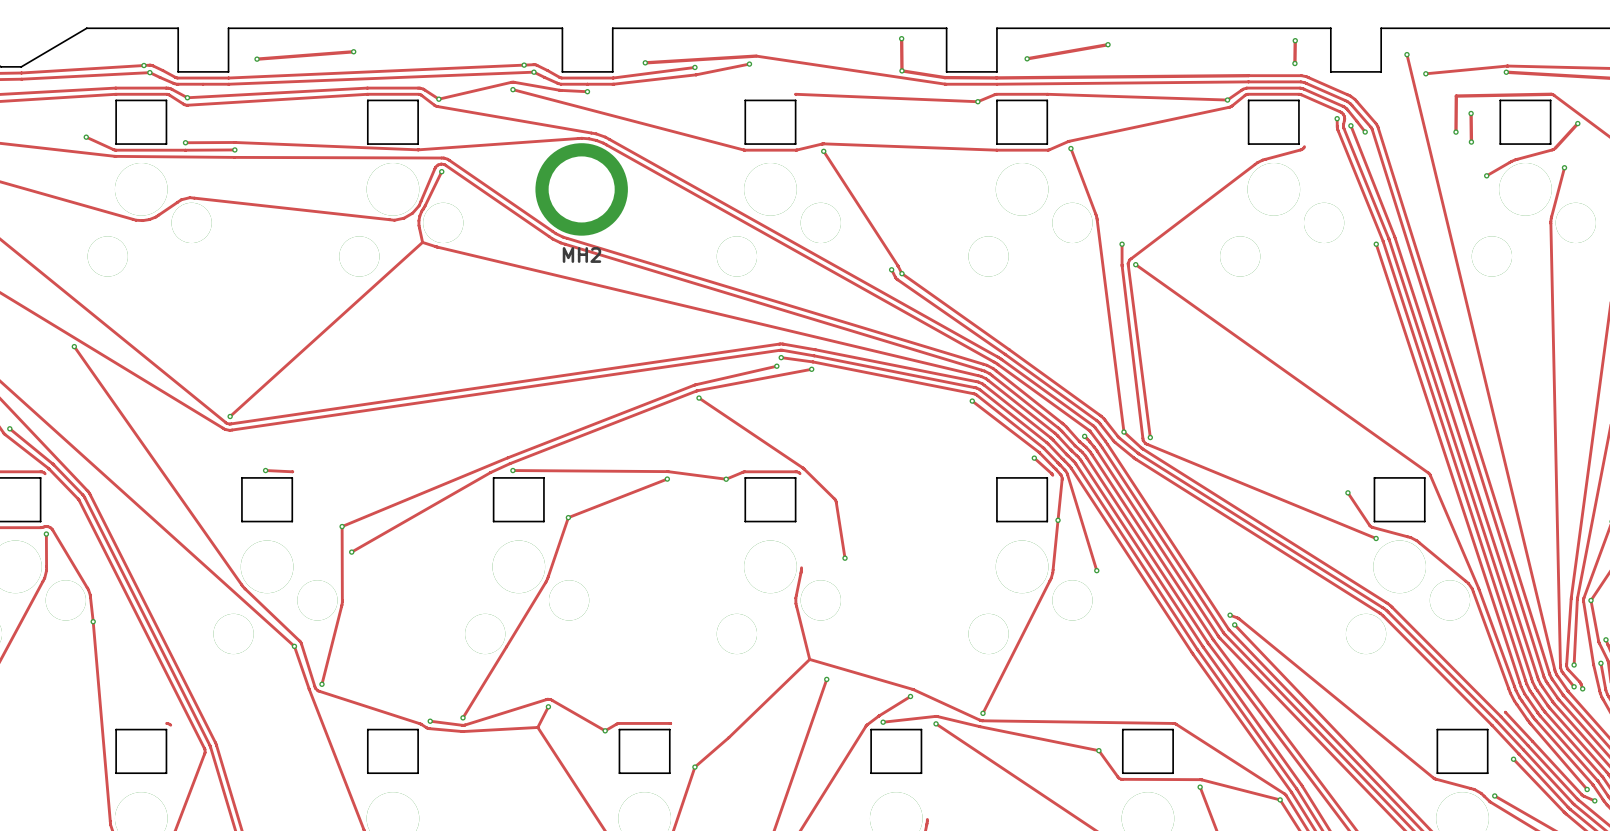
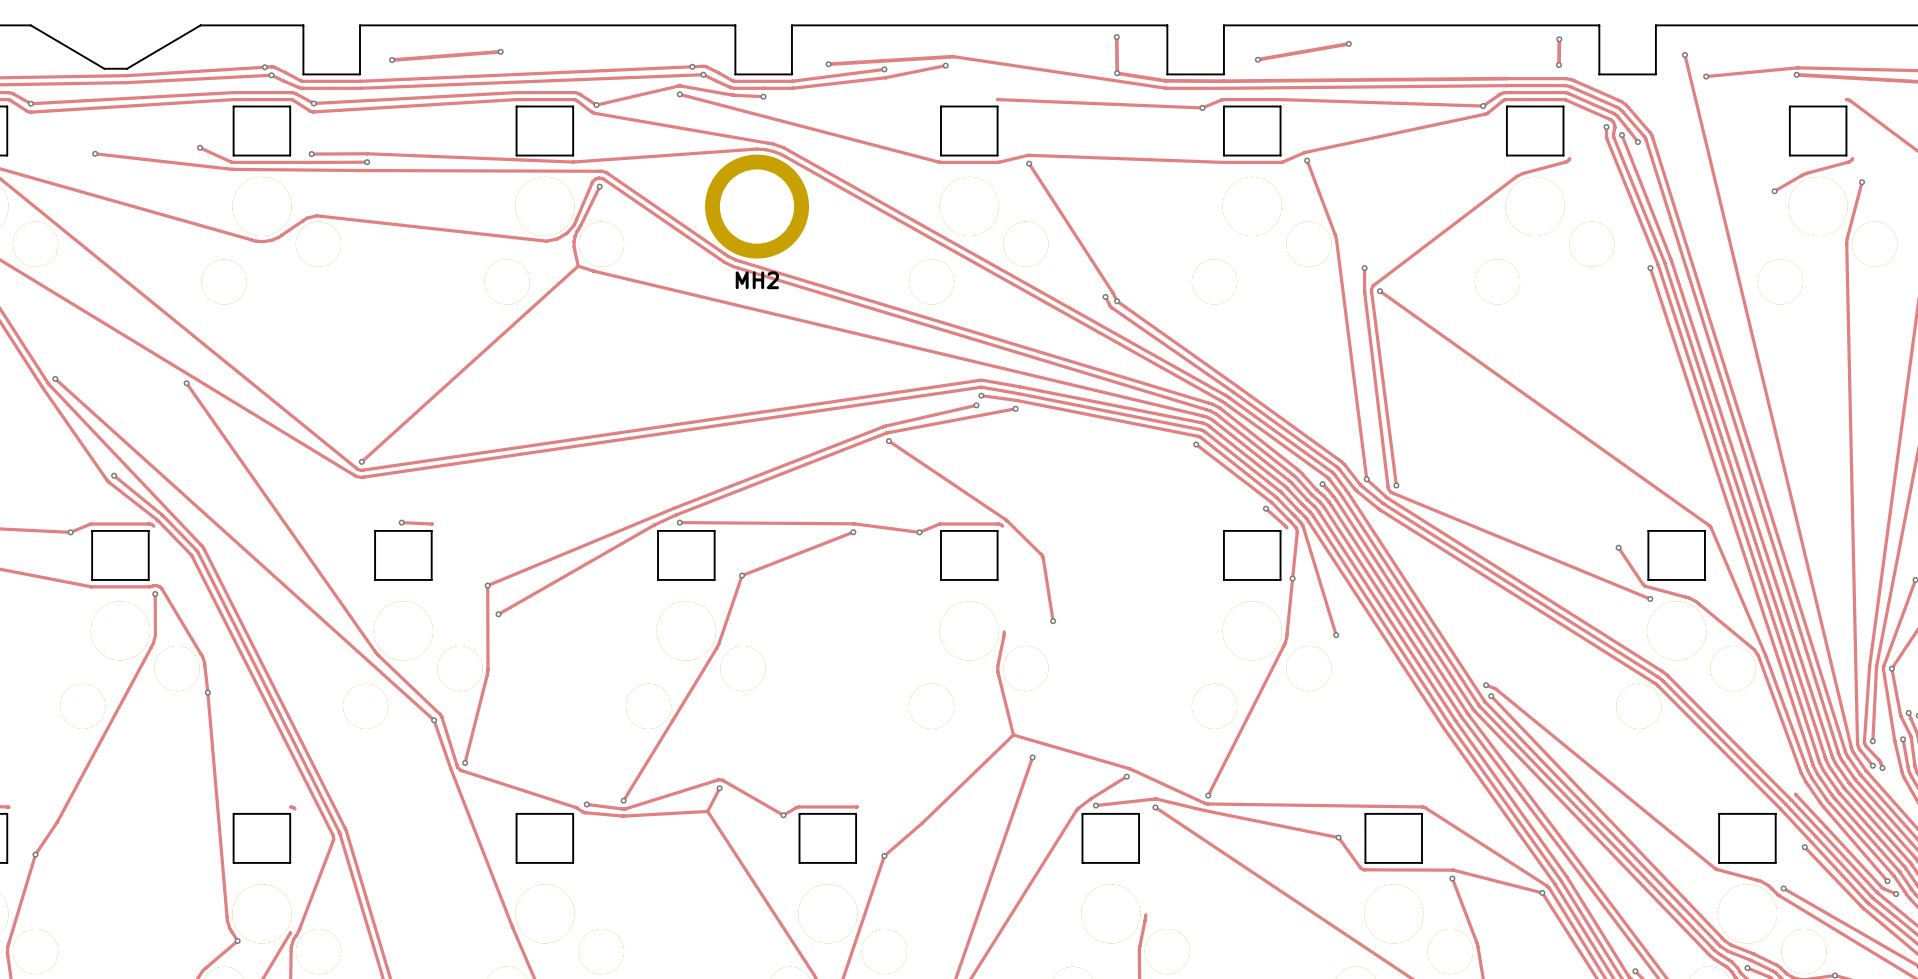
track: (1551, 94) (1456, 96) (1455, 132) -> none
track: (1471, 113) (1471, 142) -> none
via: (1471, 113) -> none
track: (1577, 123) (1555, 147) -> (1852, 158) (1852, 159)
via: (1577, 123) -> none
via: (1455, 132) -> none
via: (1471, 142) -> none

